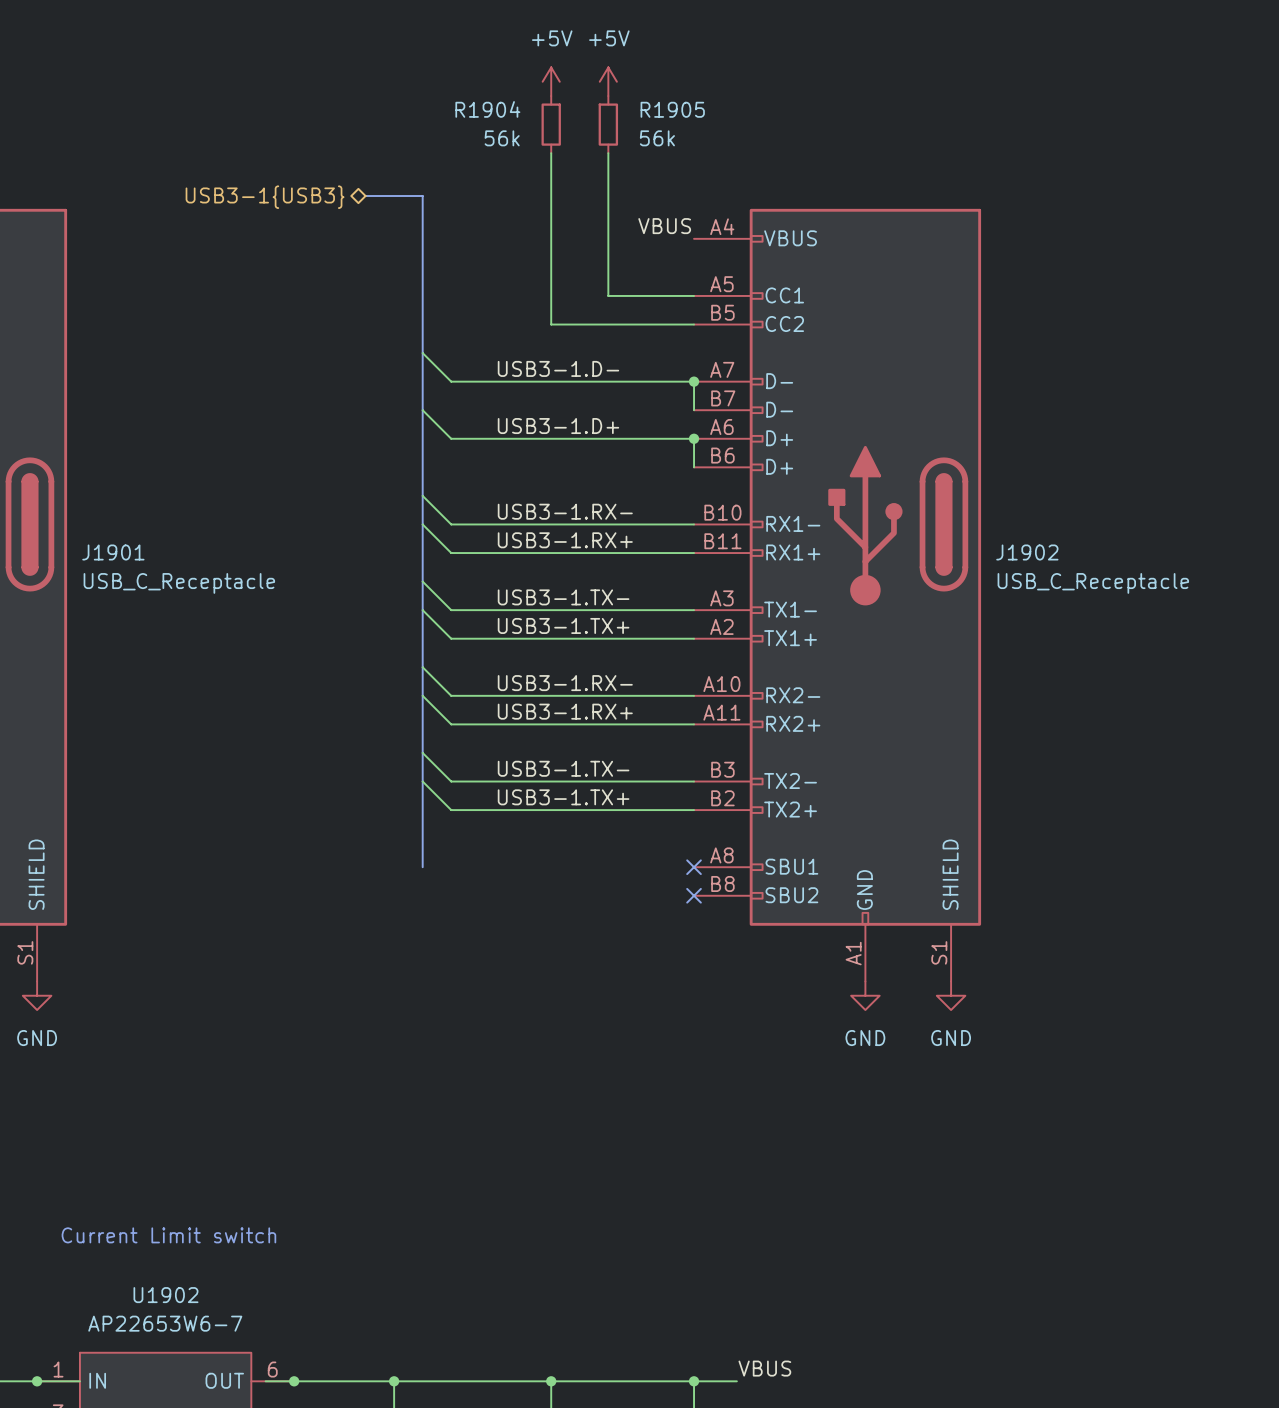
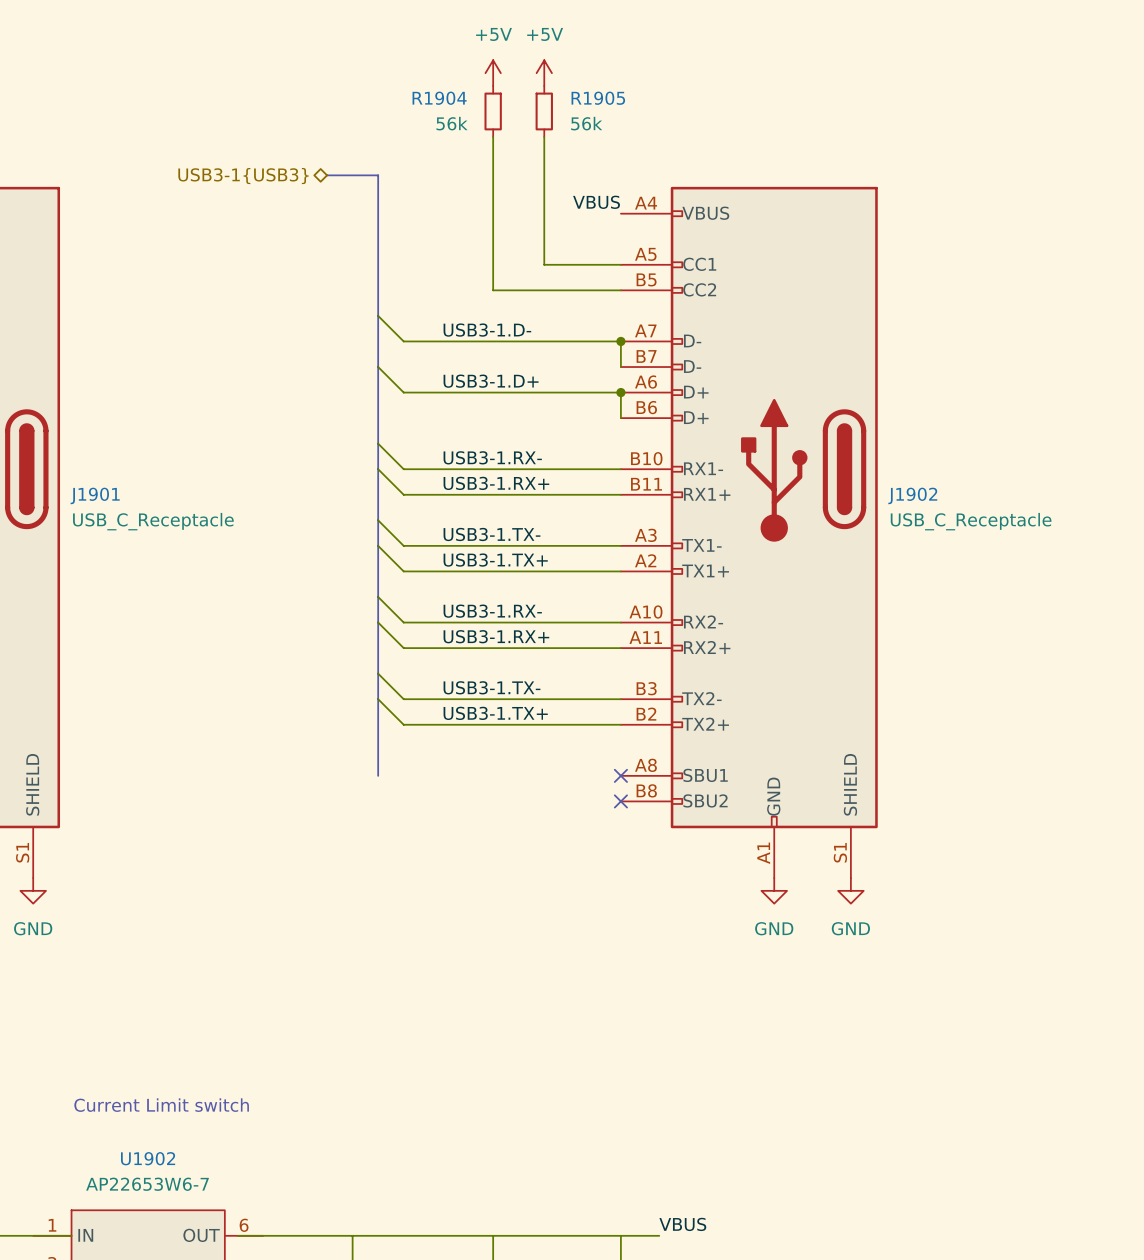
junction: (37, 1381) -> none
junction: (294, 1381) -> none
junction: (394, 1381) -> none
junction: (551, 1381) -> none
junction: (694, 1381) -> none

